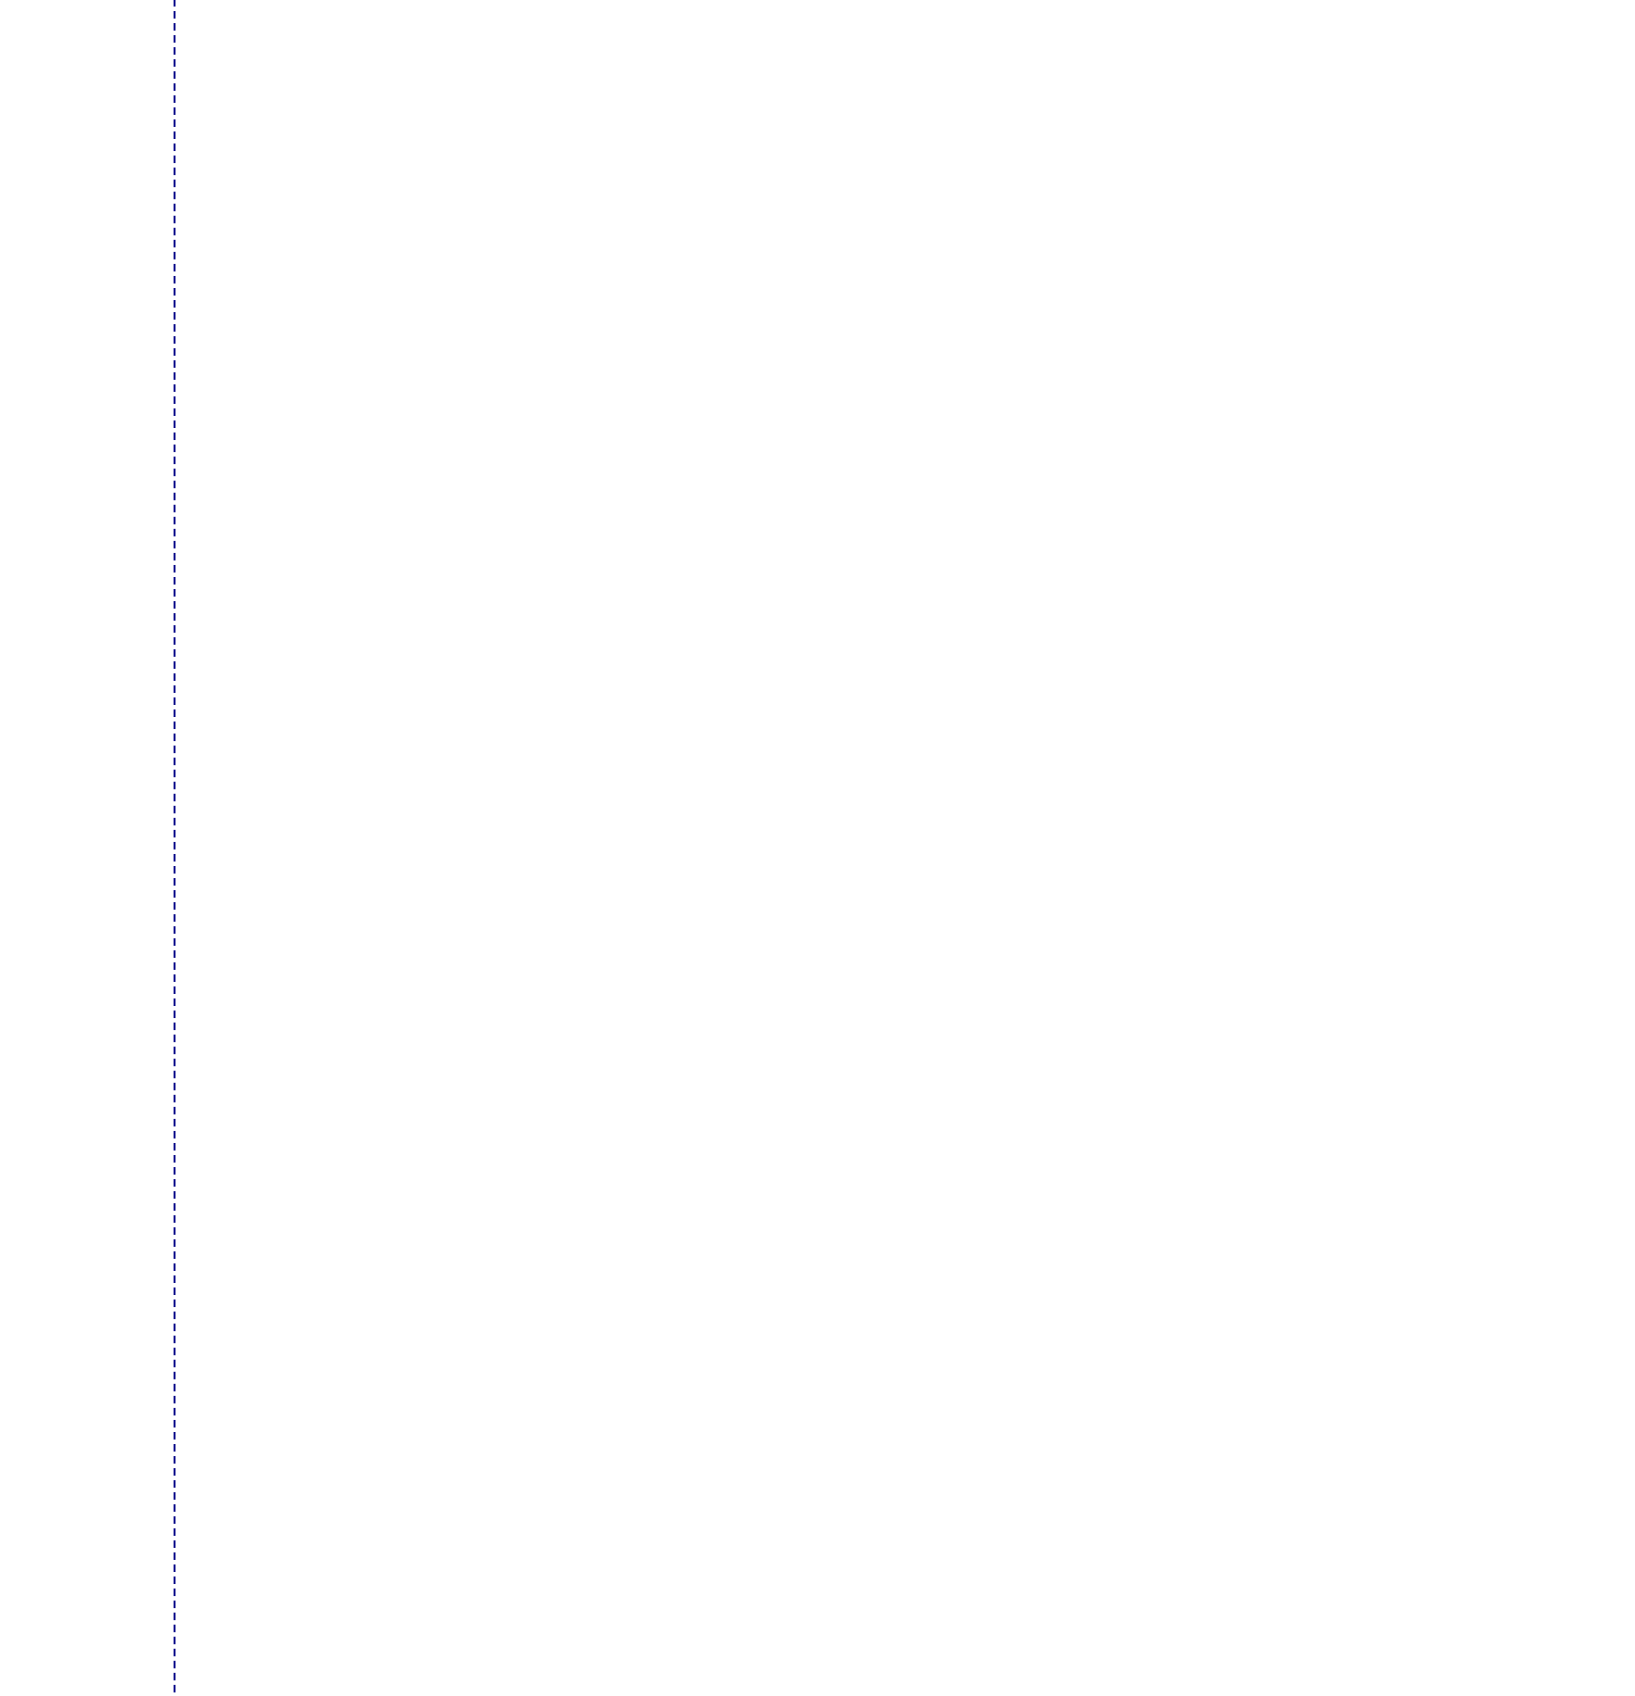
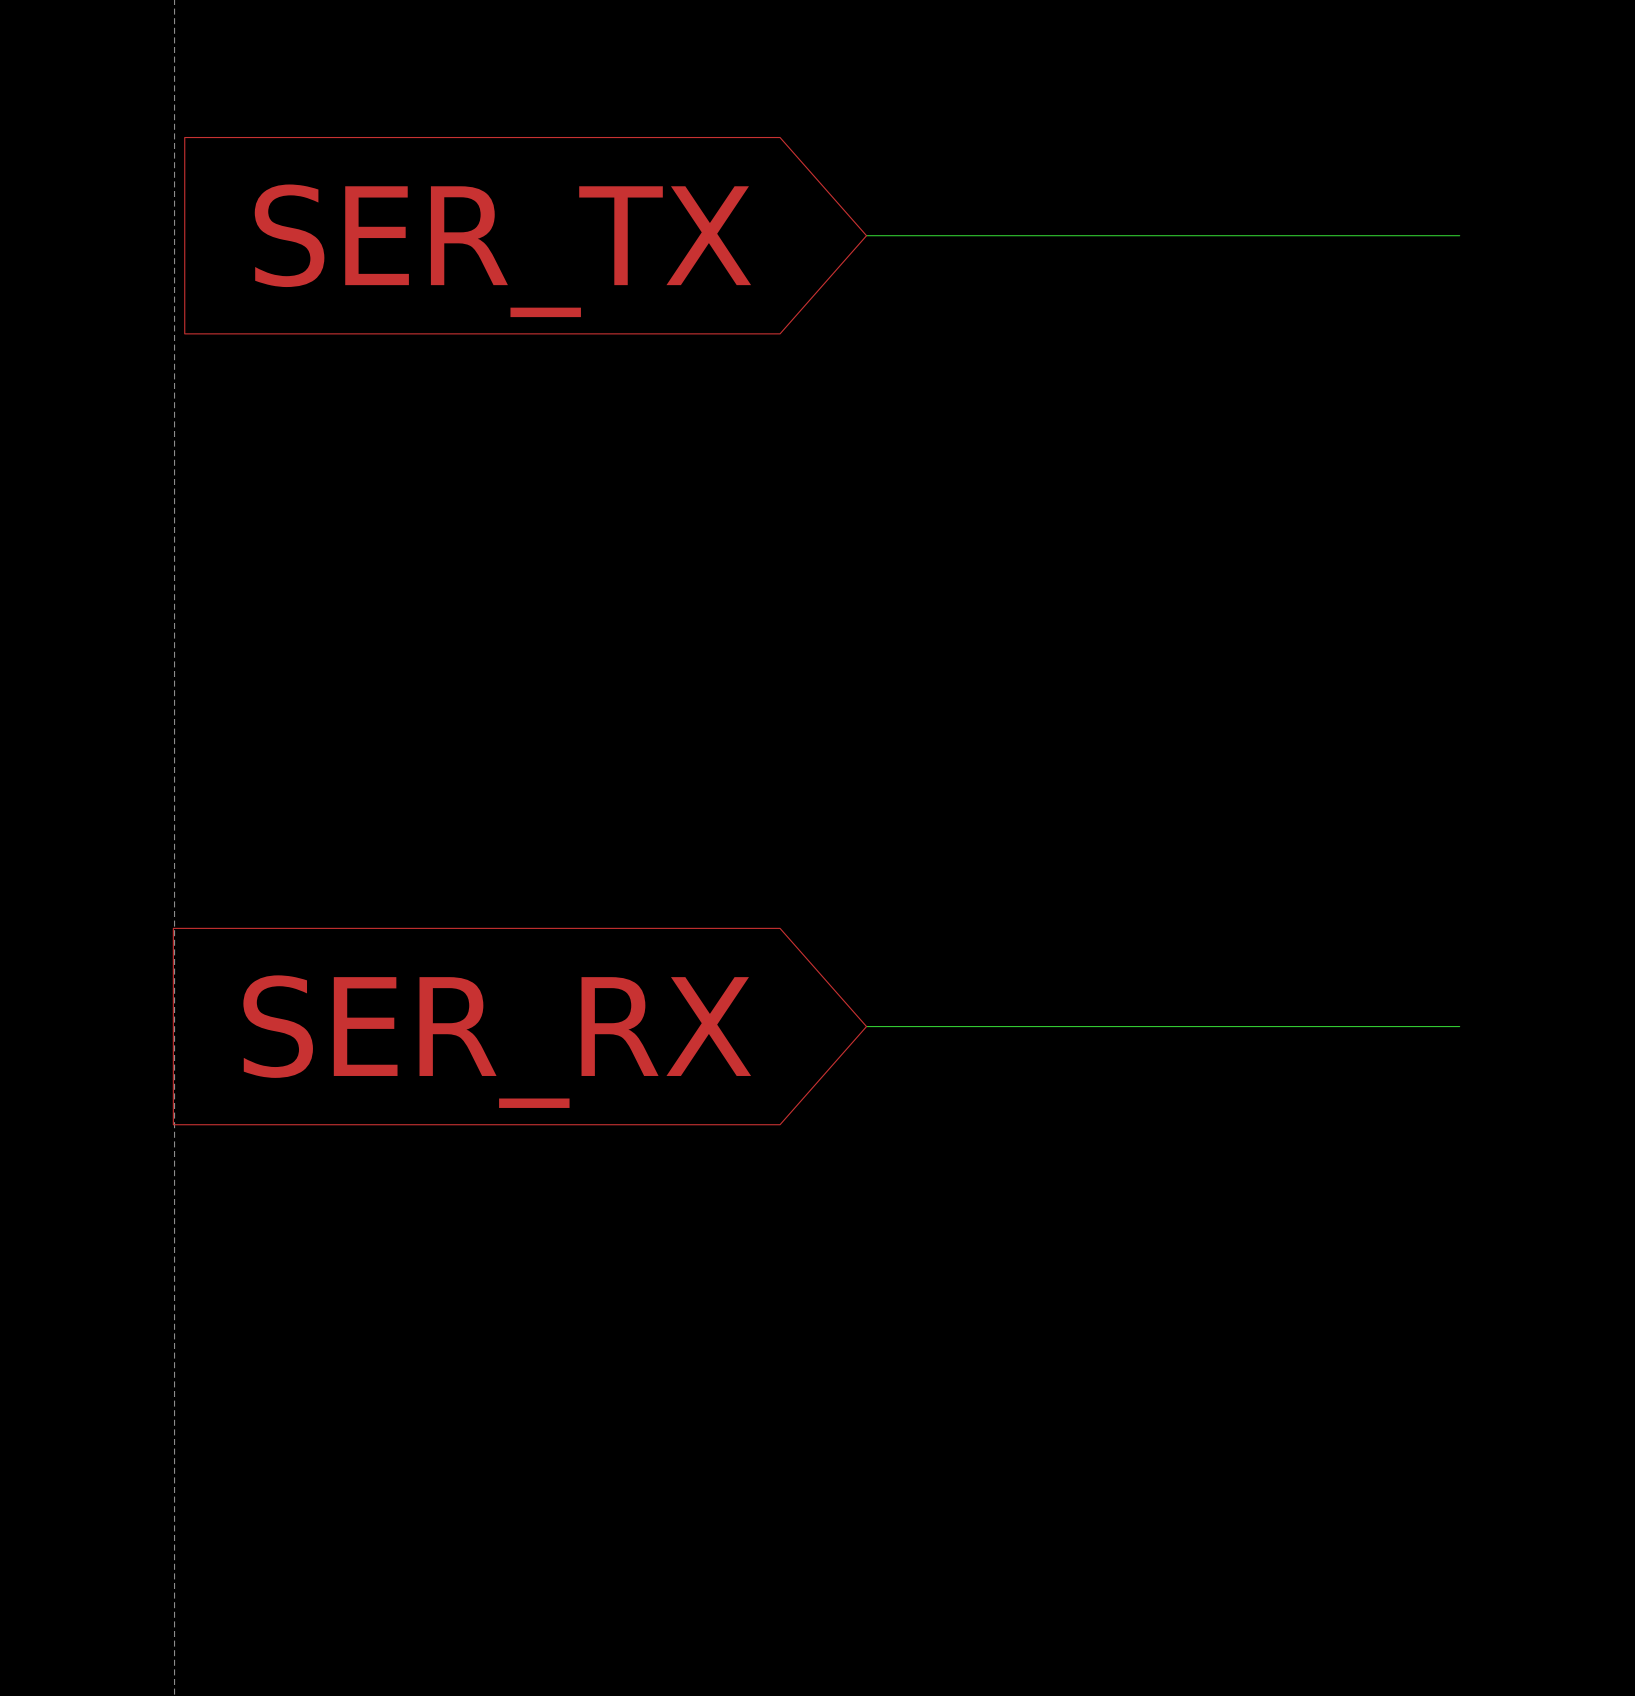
wire: none -> (866, 235) (1459, 235)
global label: none -> SER_TX (502, 250)
wire: none -> (866, 1026) (1459, 1026)
global label: none -> SER_RX (497, 1041)

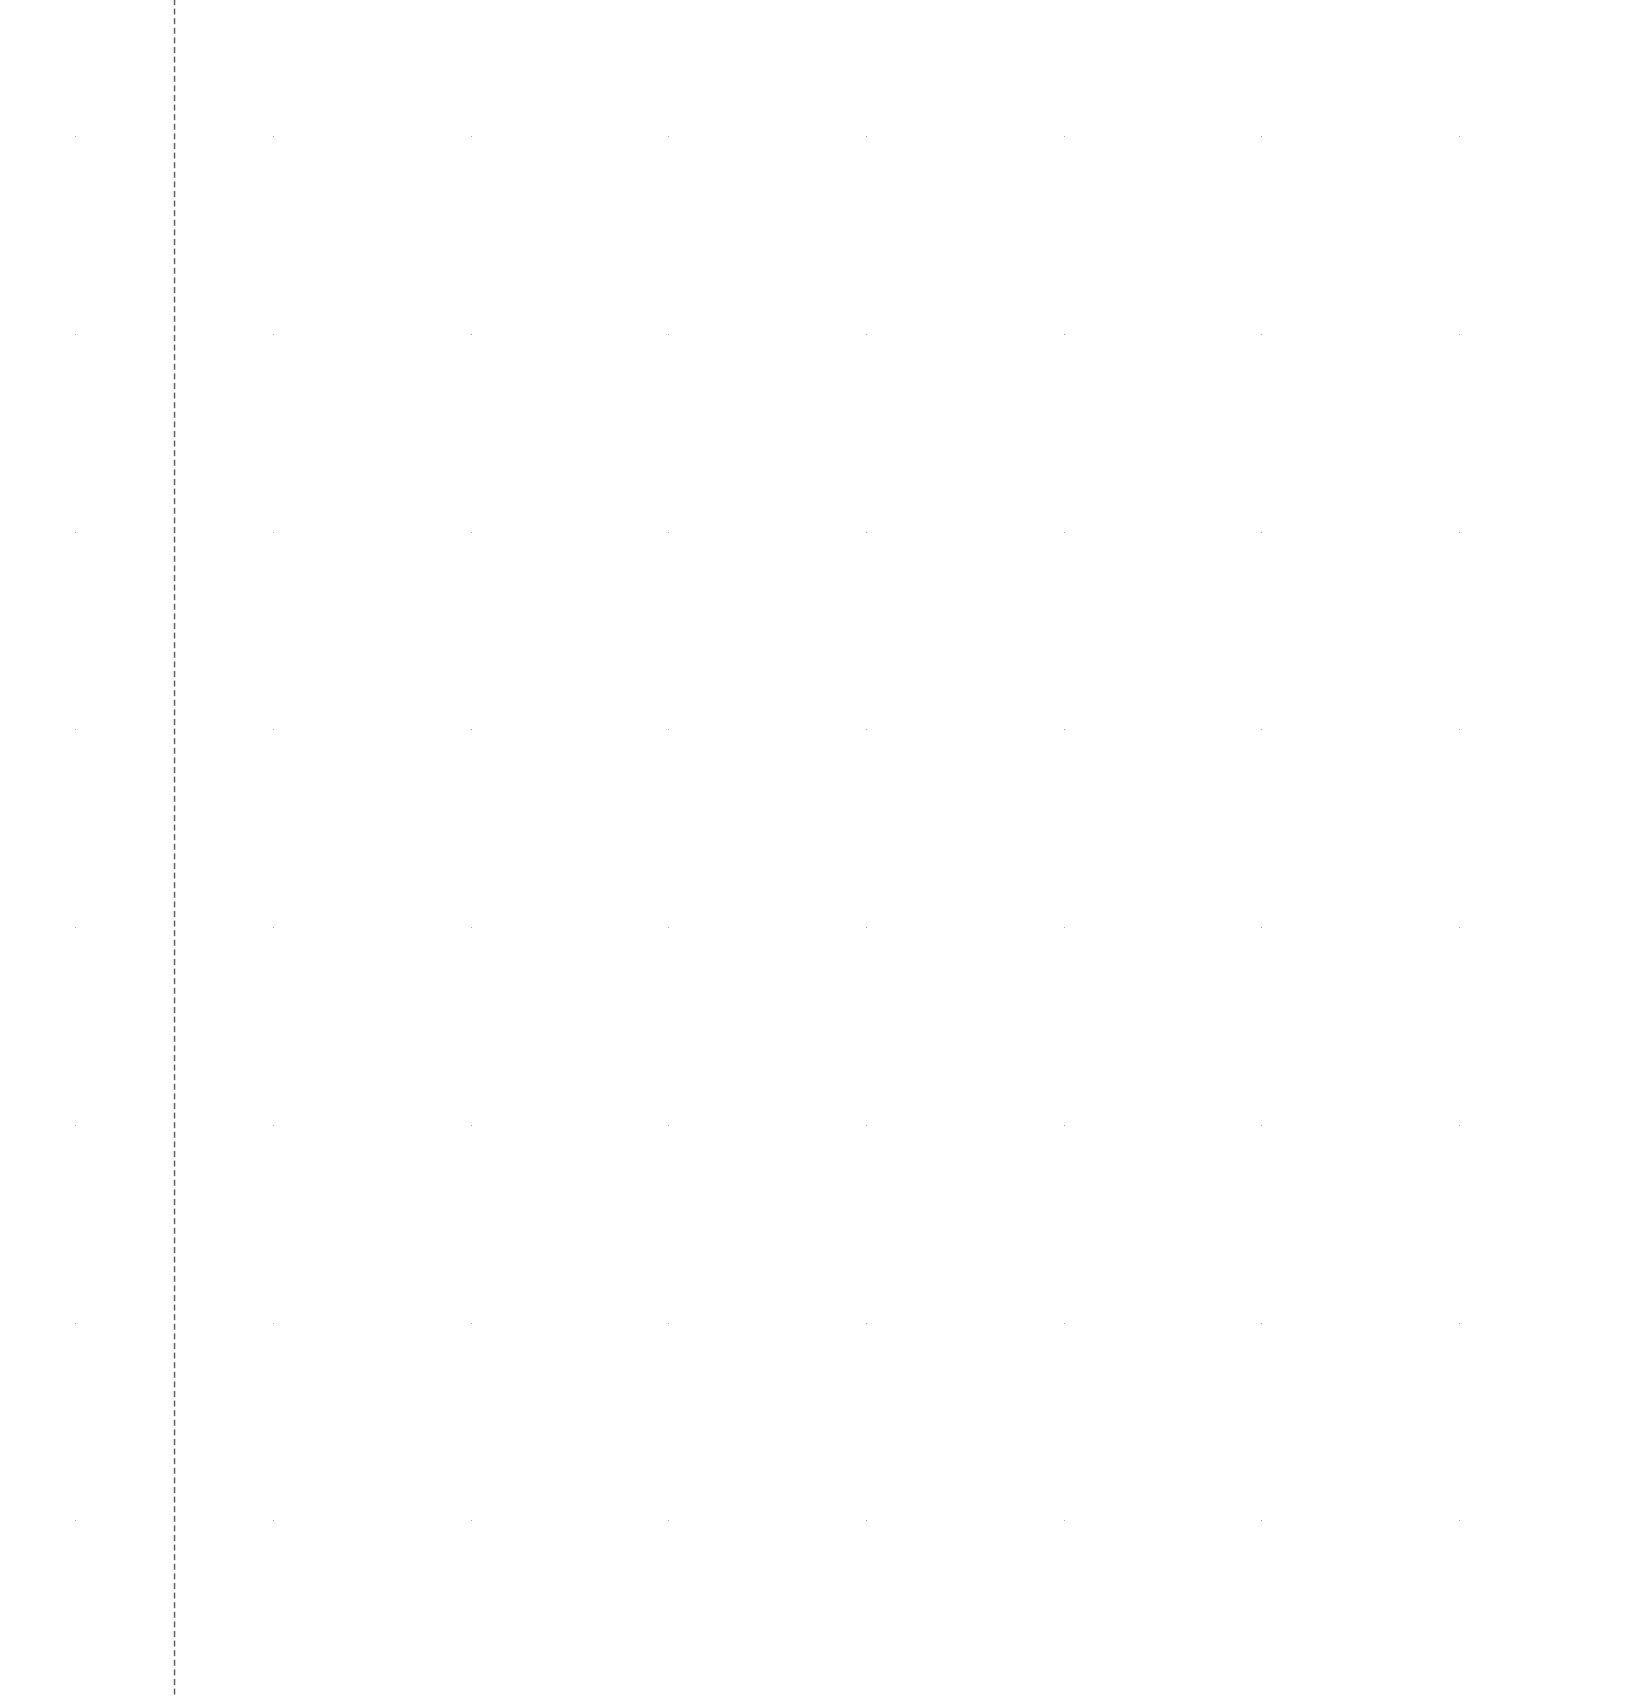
wire: (866, 235) (1459, 235) -> none
global label: SER_TX (502, 250) -> none
wire: (866, 1026) (1459, 1026) -> none
global label: SER_RX (497, 1041) -> none

